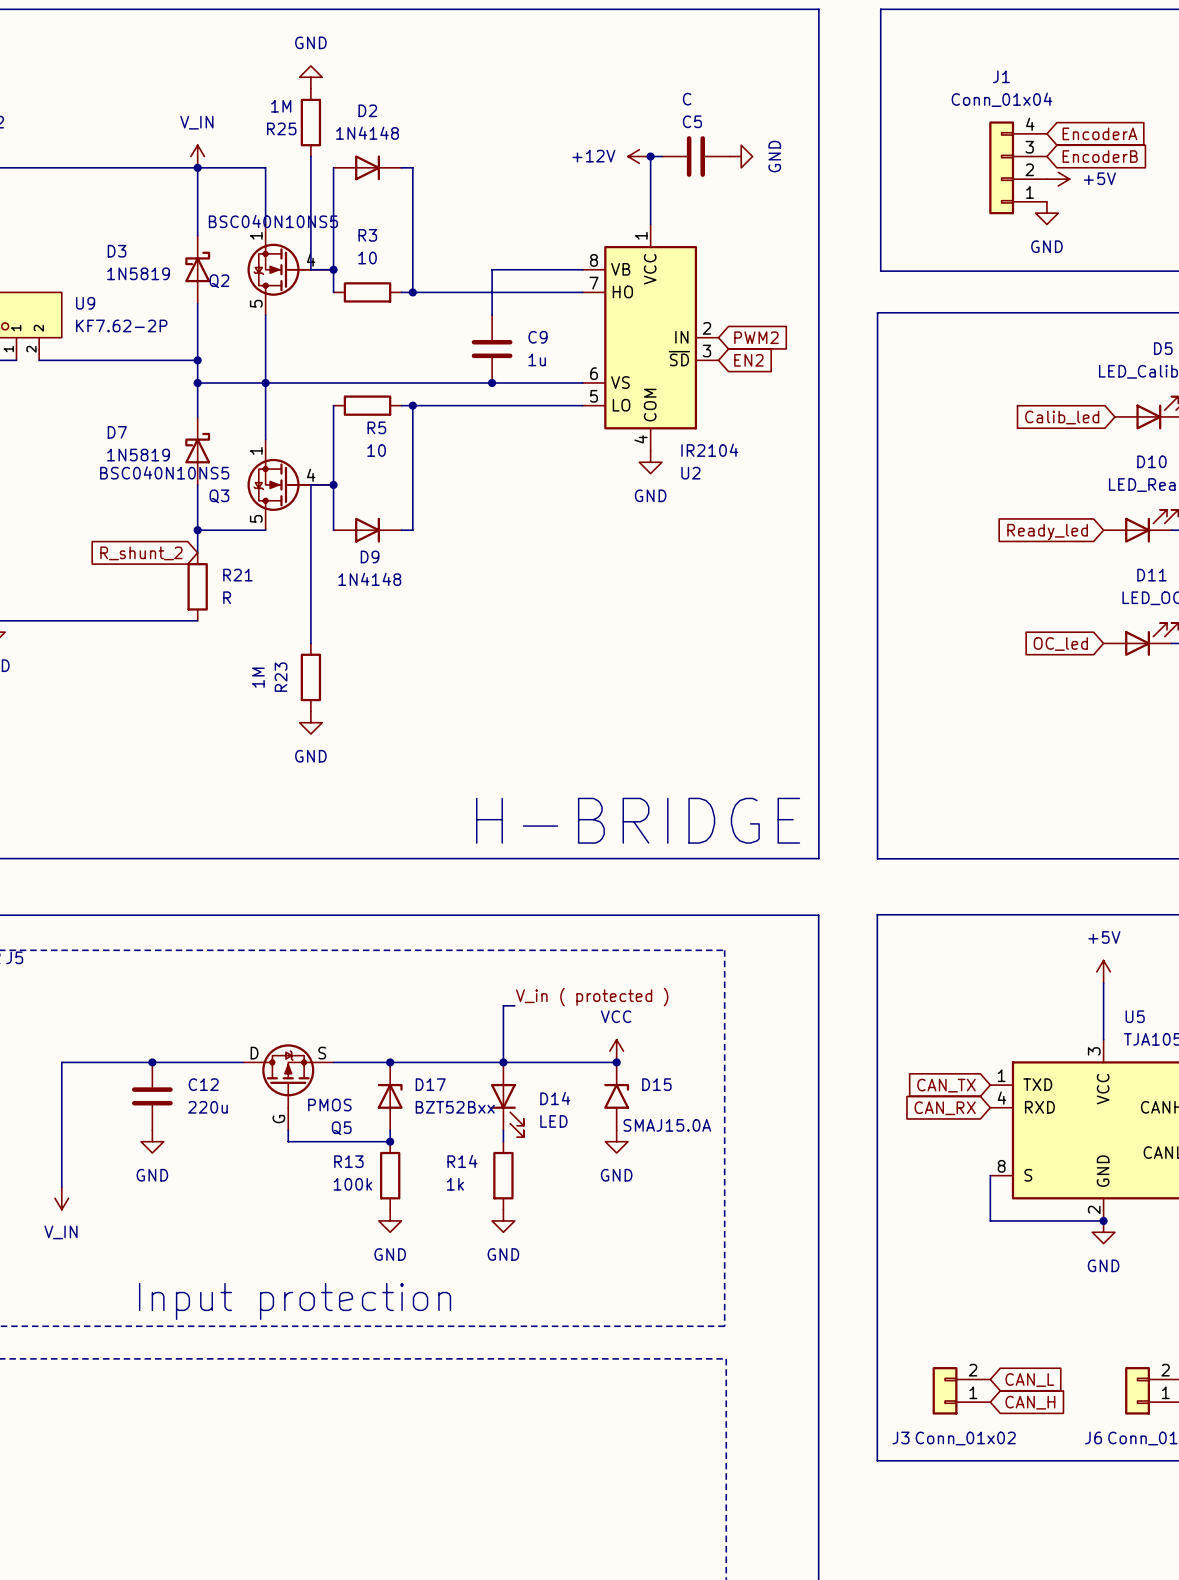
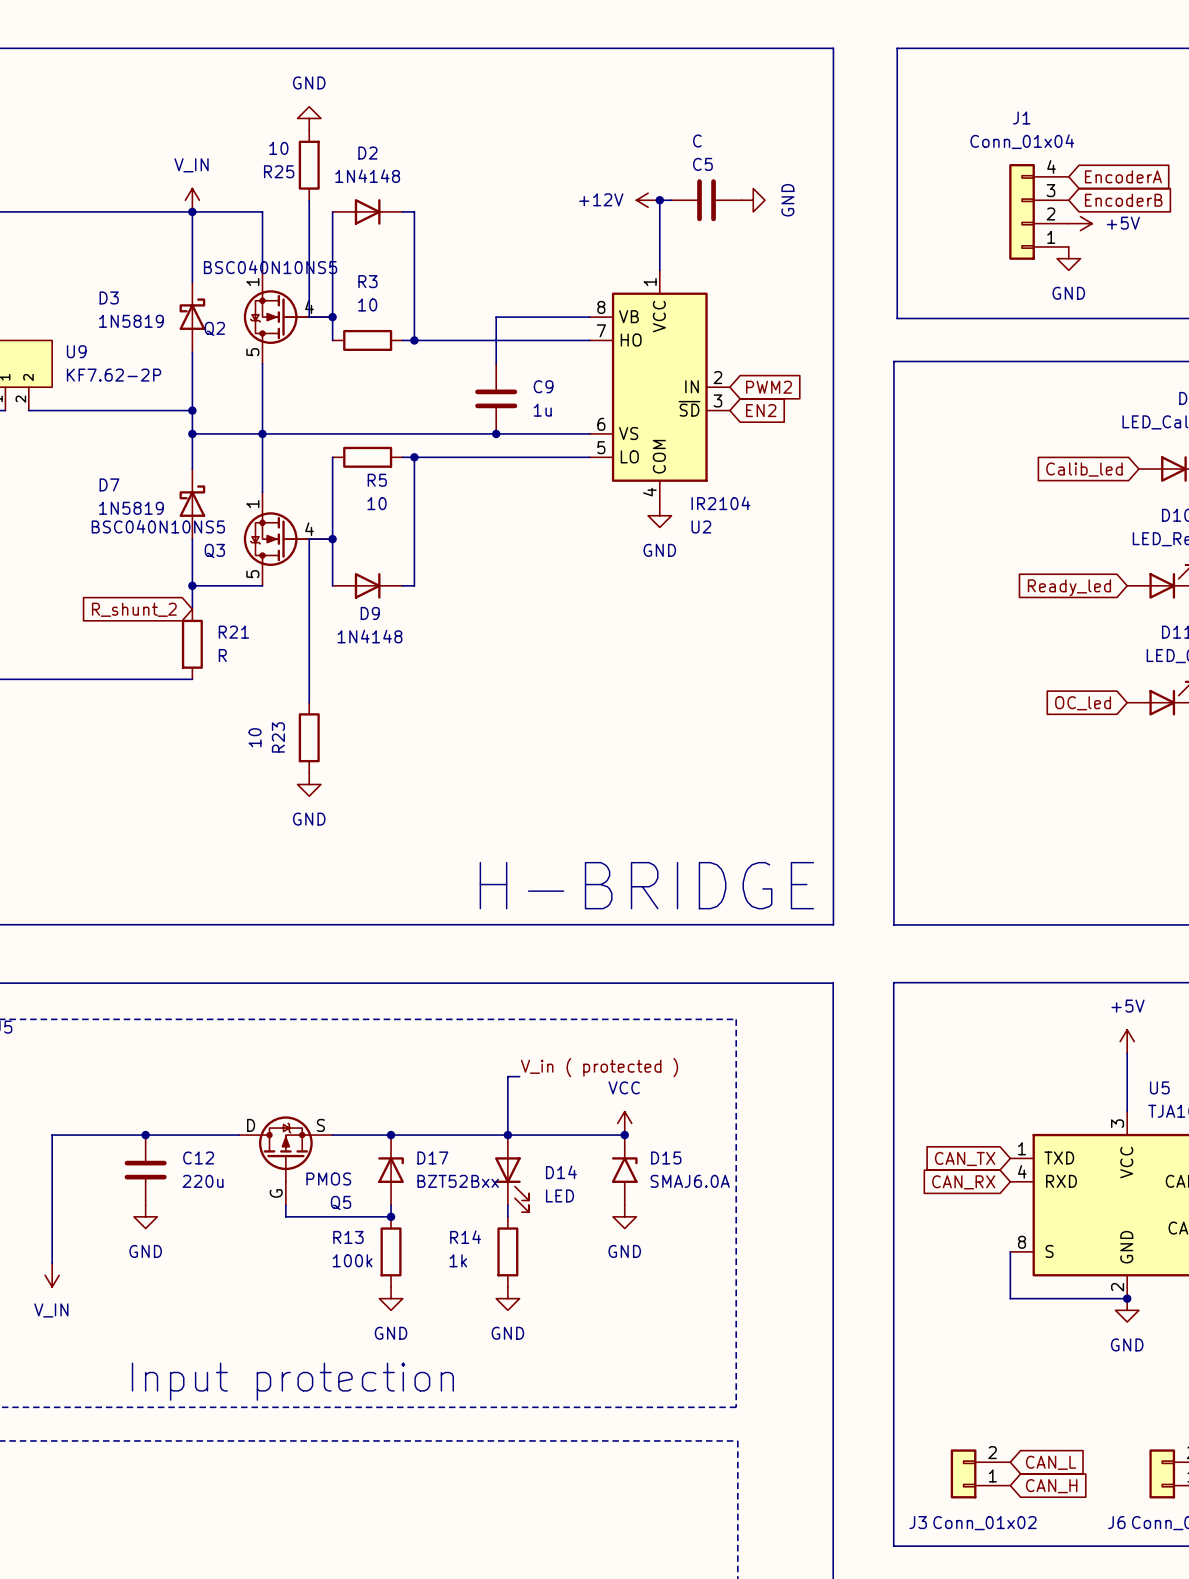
R25 value: 1M (281, 106) -> 10 (278, 148)
R23 value: 1M (258, 677) -> 10 (255, 737)
D15 value: SMAJ15.0A (667, 1125) -> SMAJ6.0A (690, 1181)

